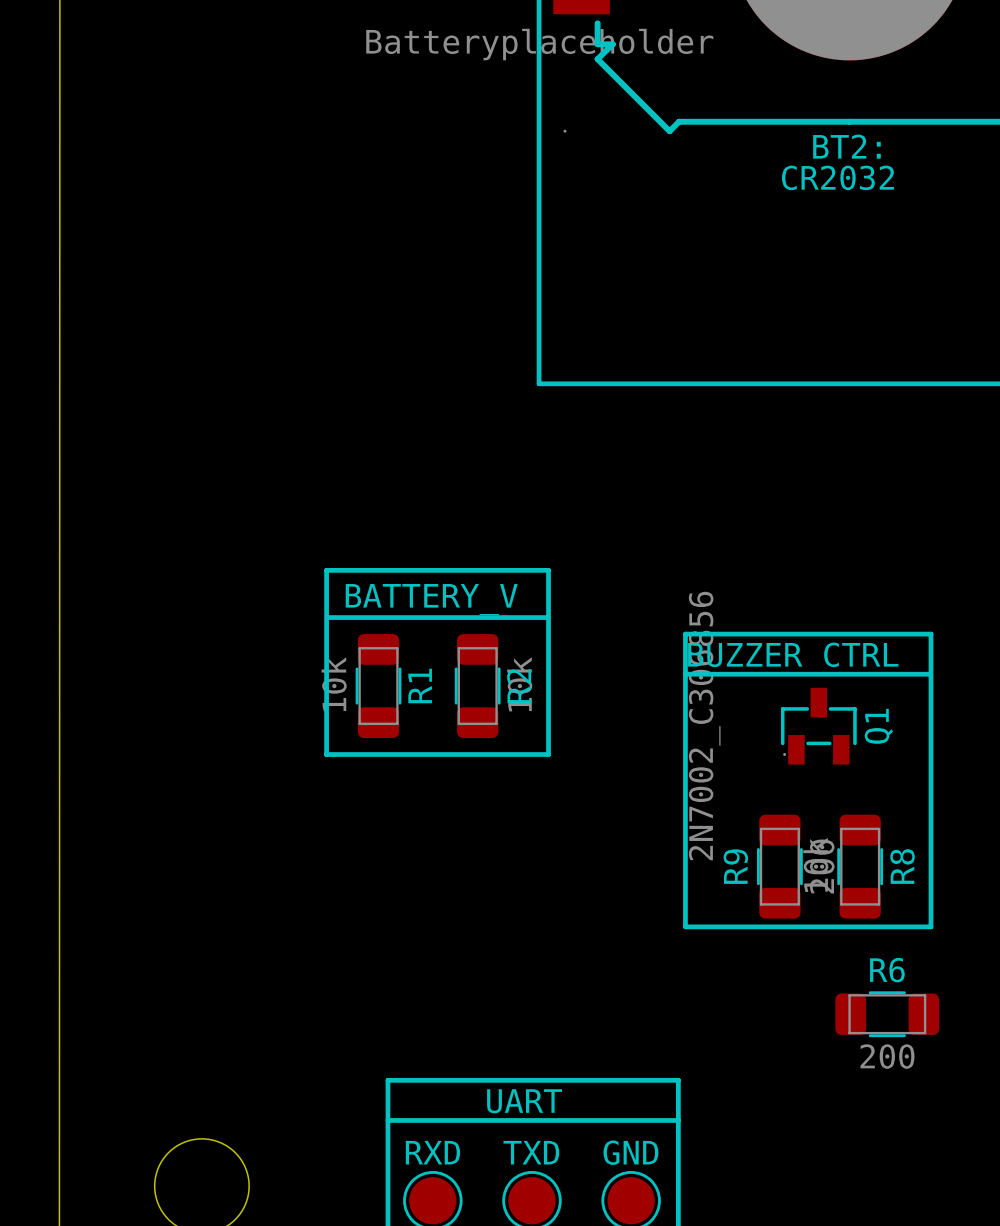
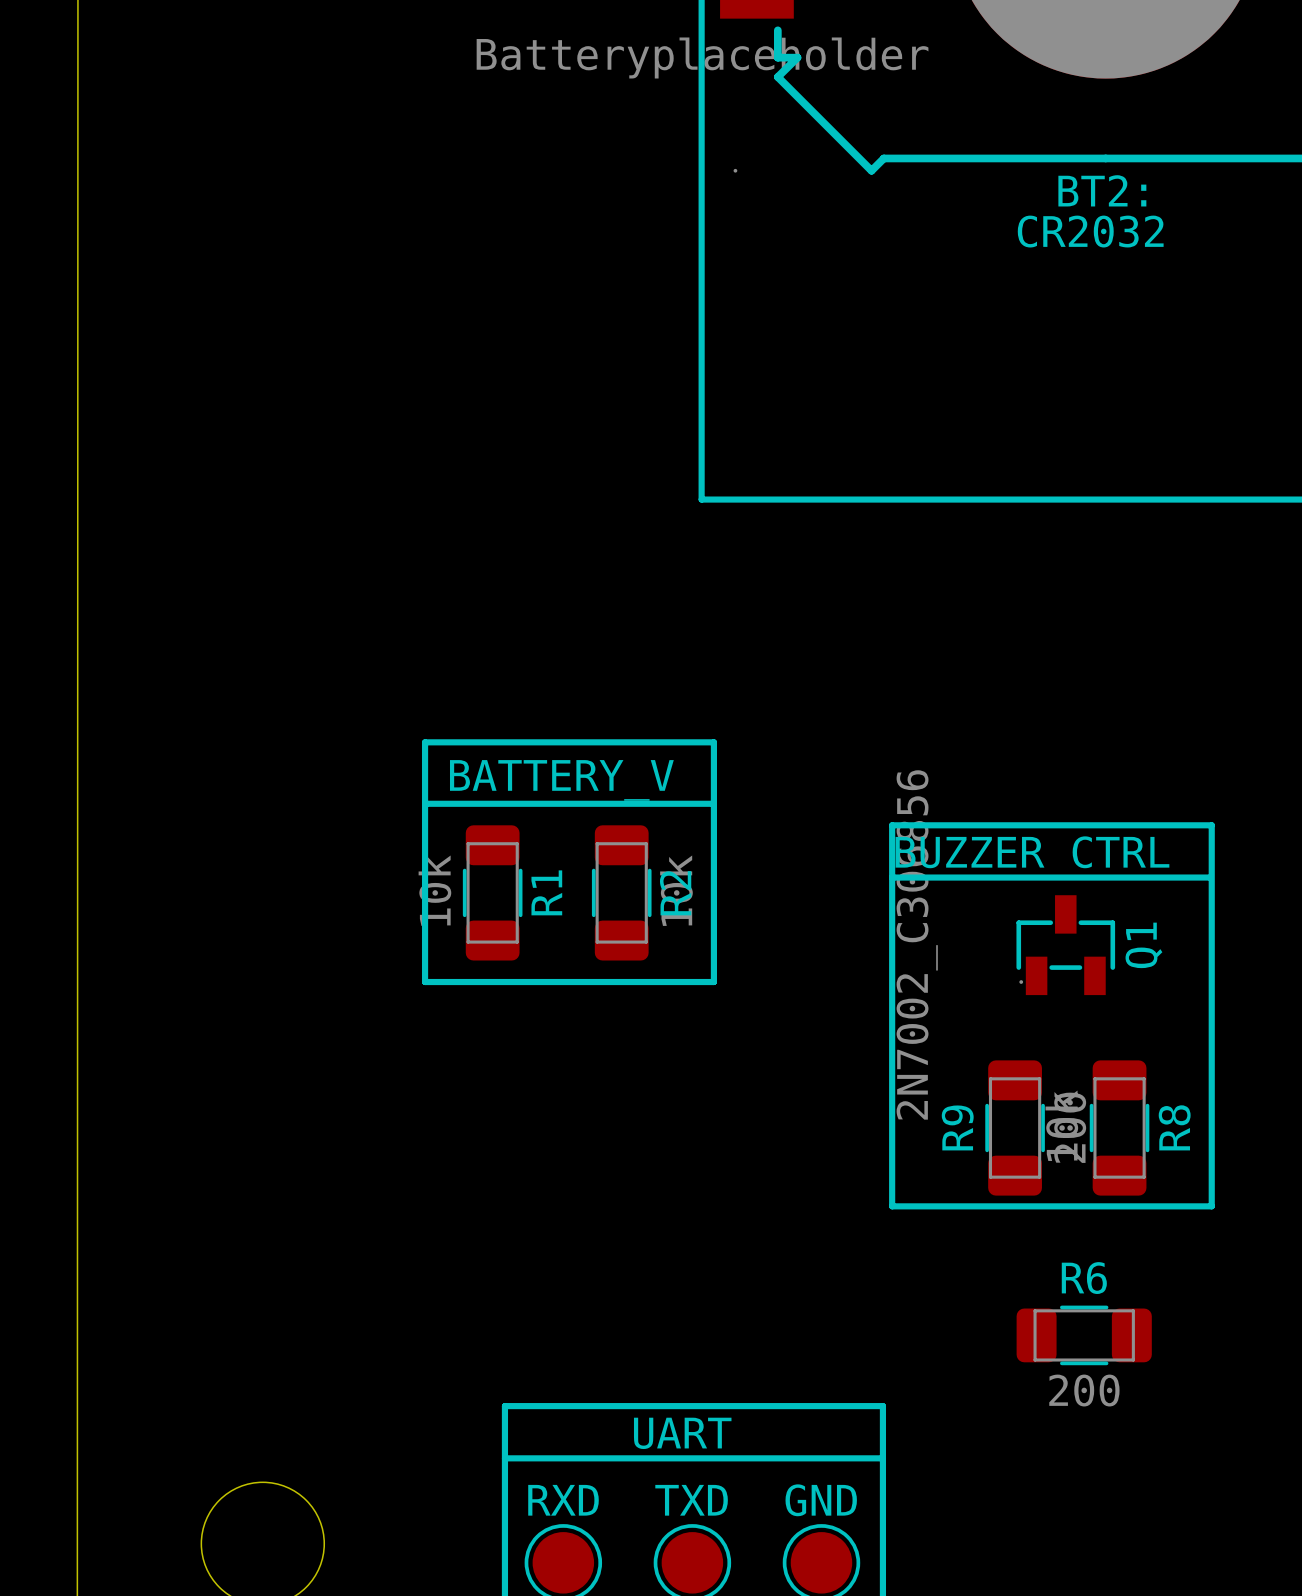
R6 position: (887, 1014) -> (1084, 1335)

